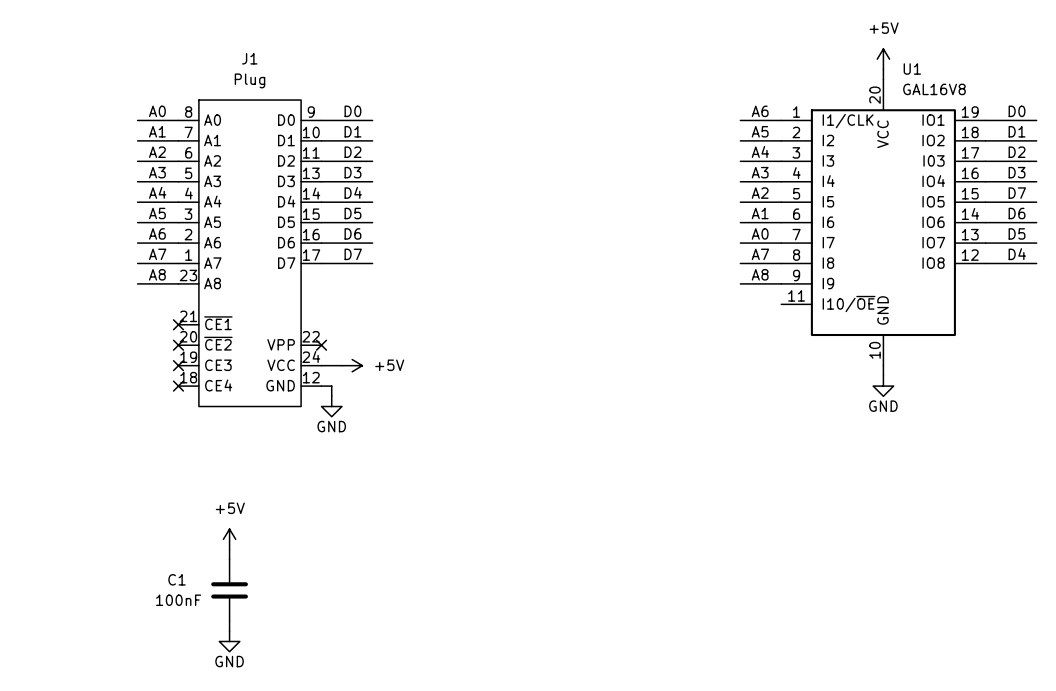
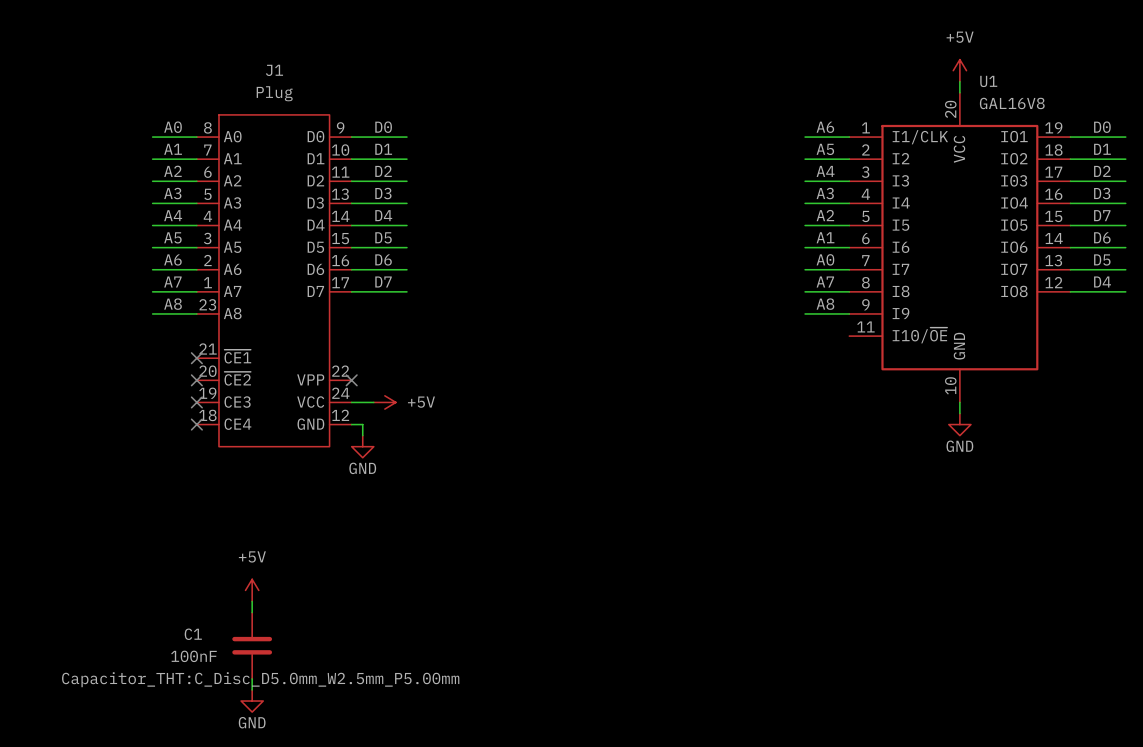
C1 text: none -> Capacitor_THT:C_Disc_D5.0mm_W2.5mm_P5.00mm (260, 679)

